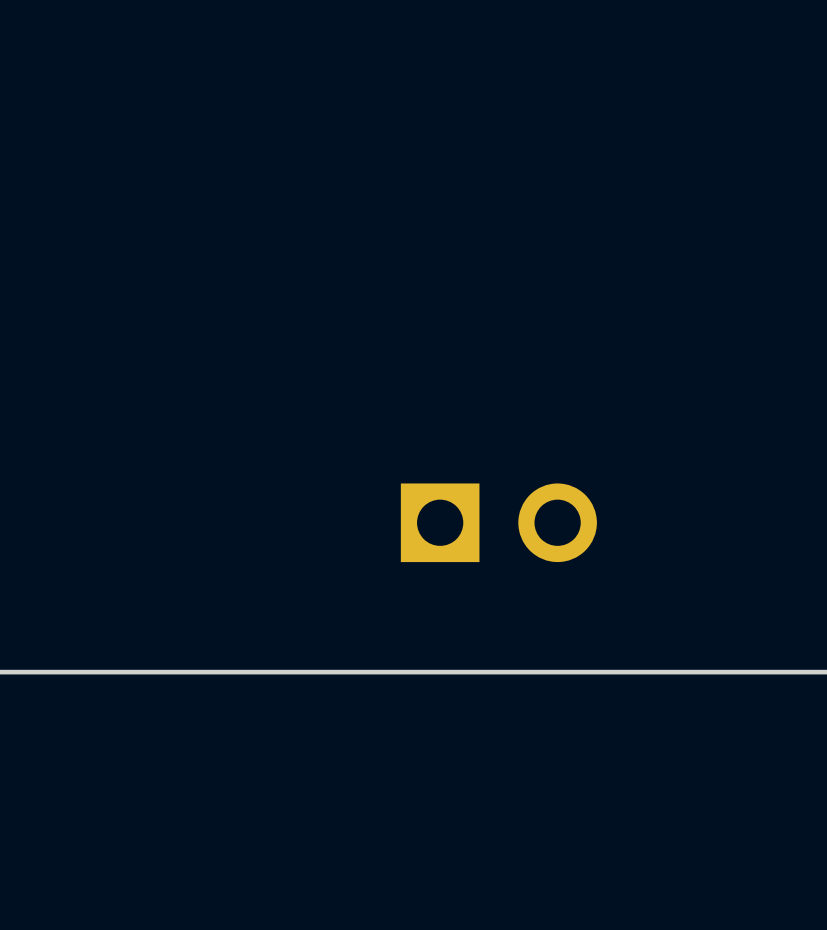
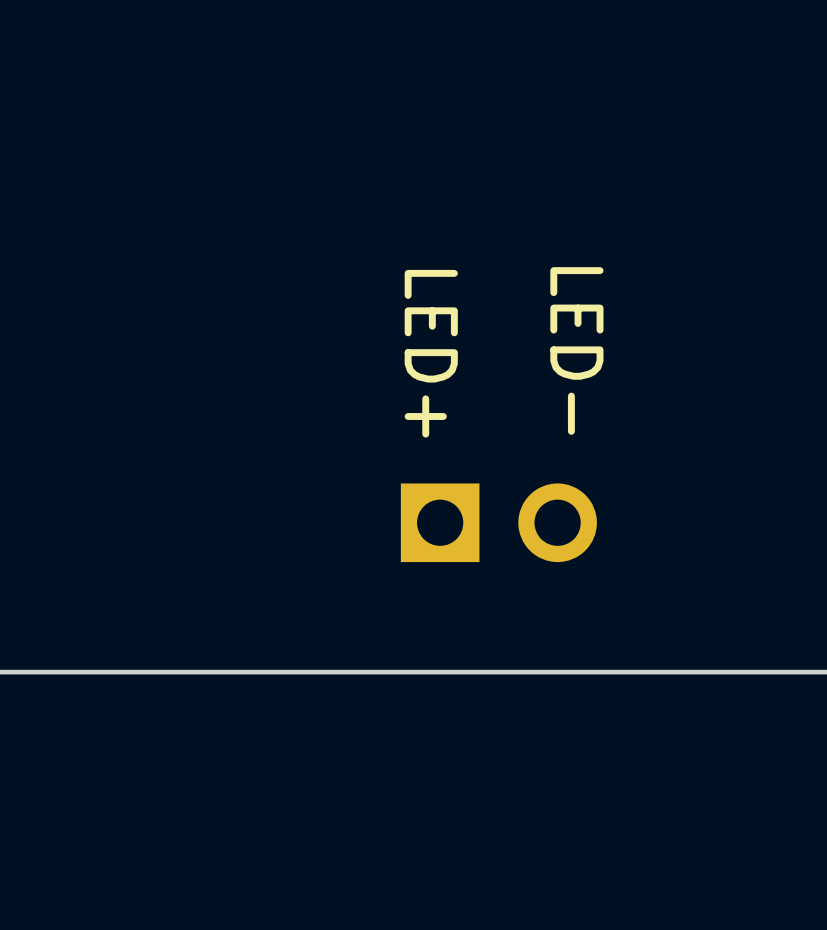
text: none -> LED- (576, 350)
text: none -> LED+ (431, 353)

